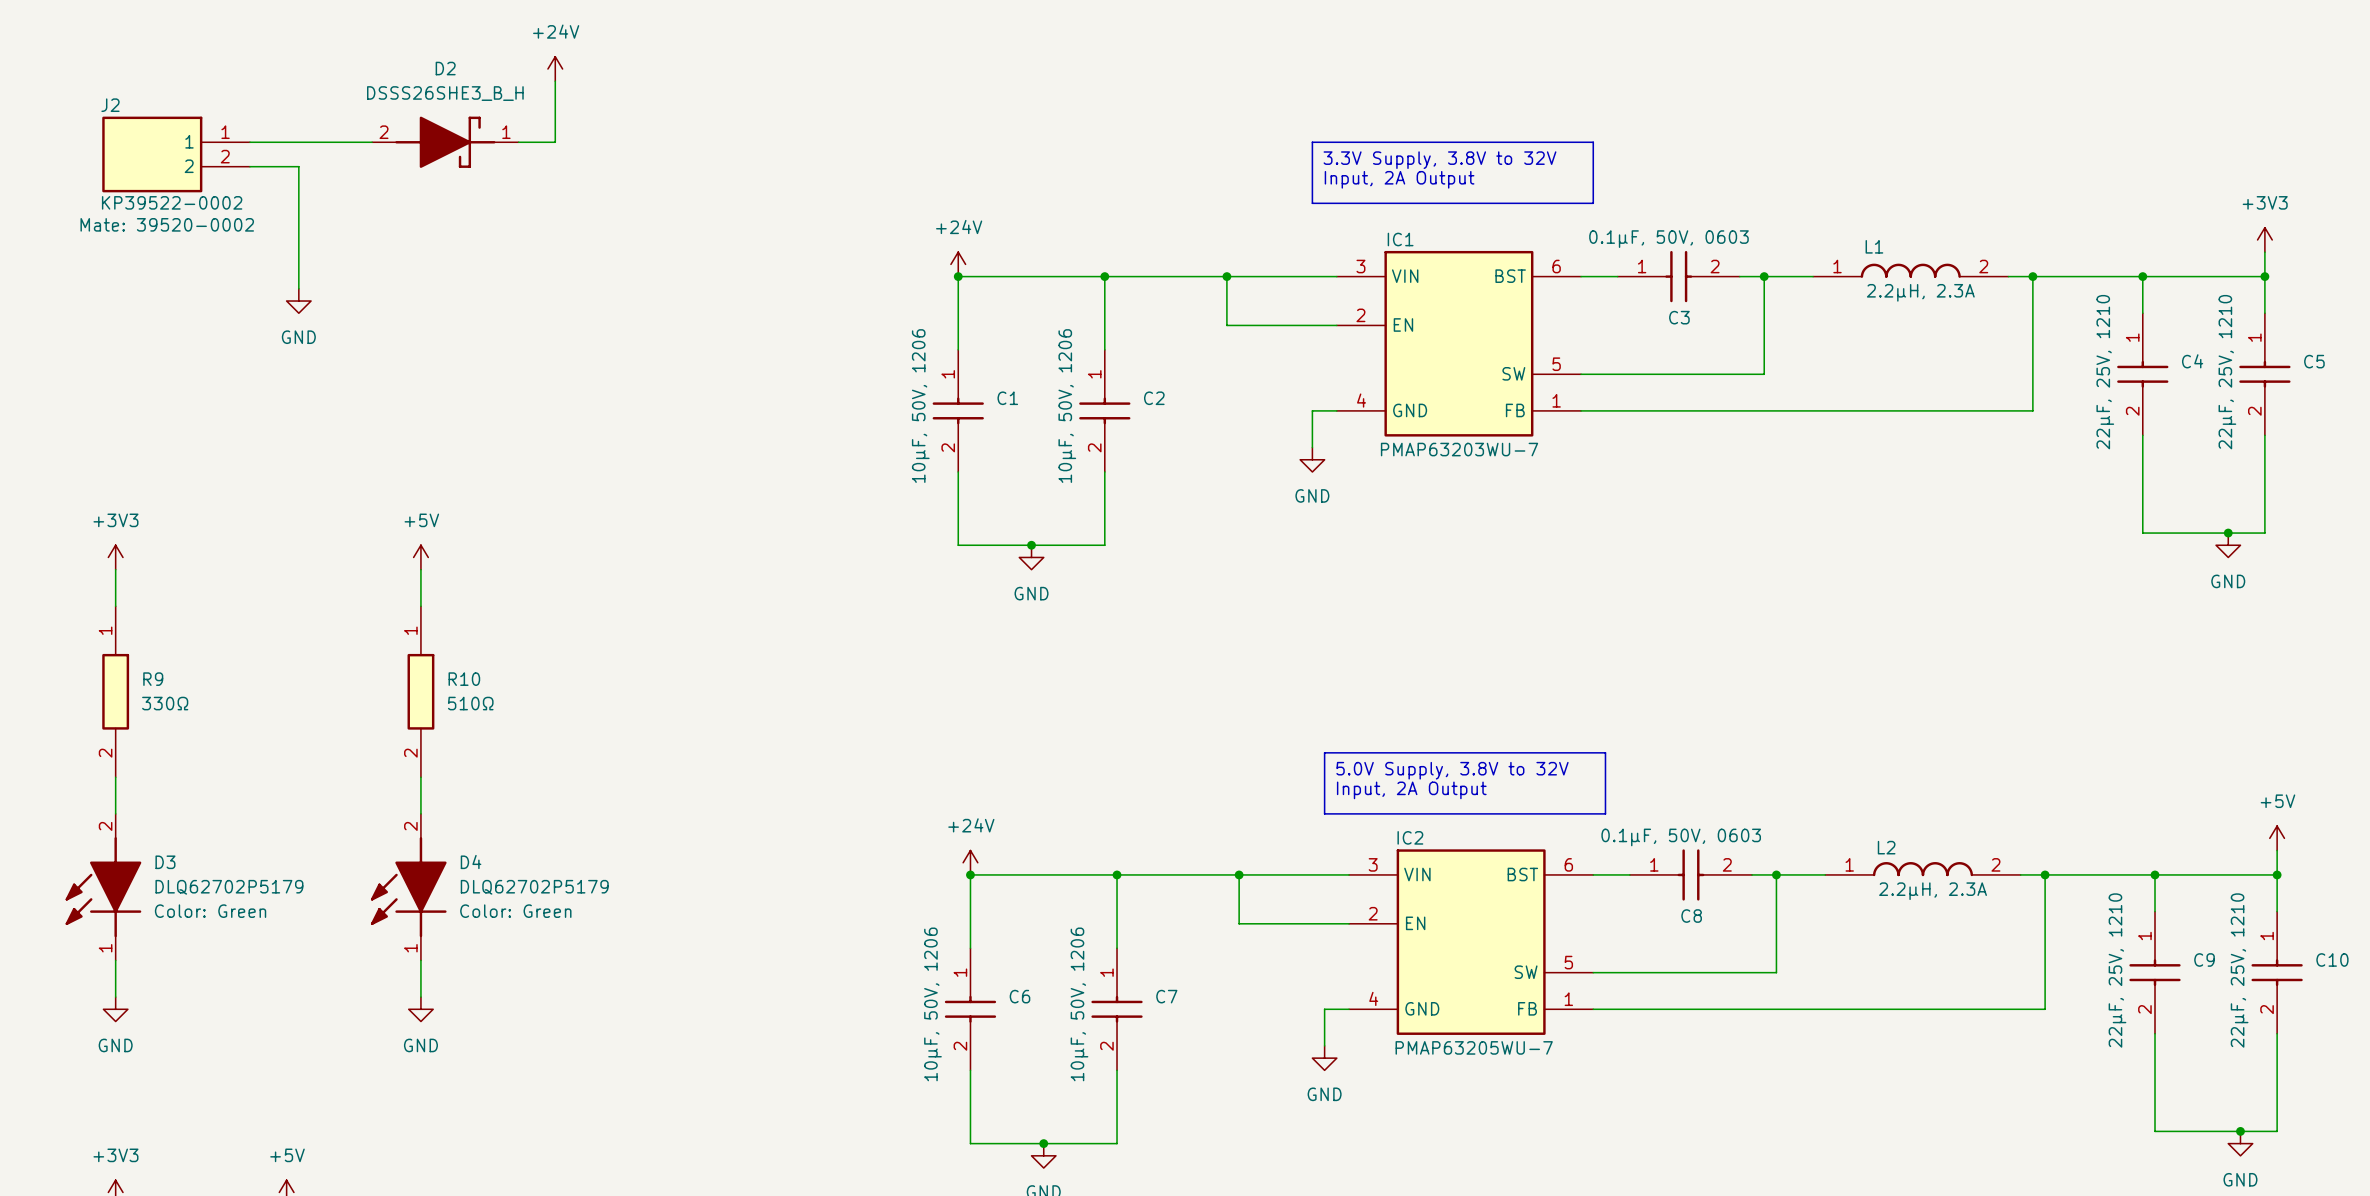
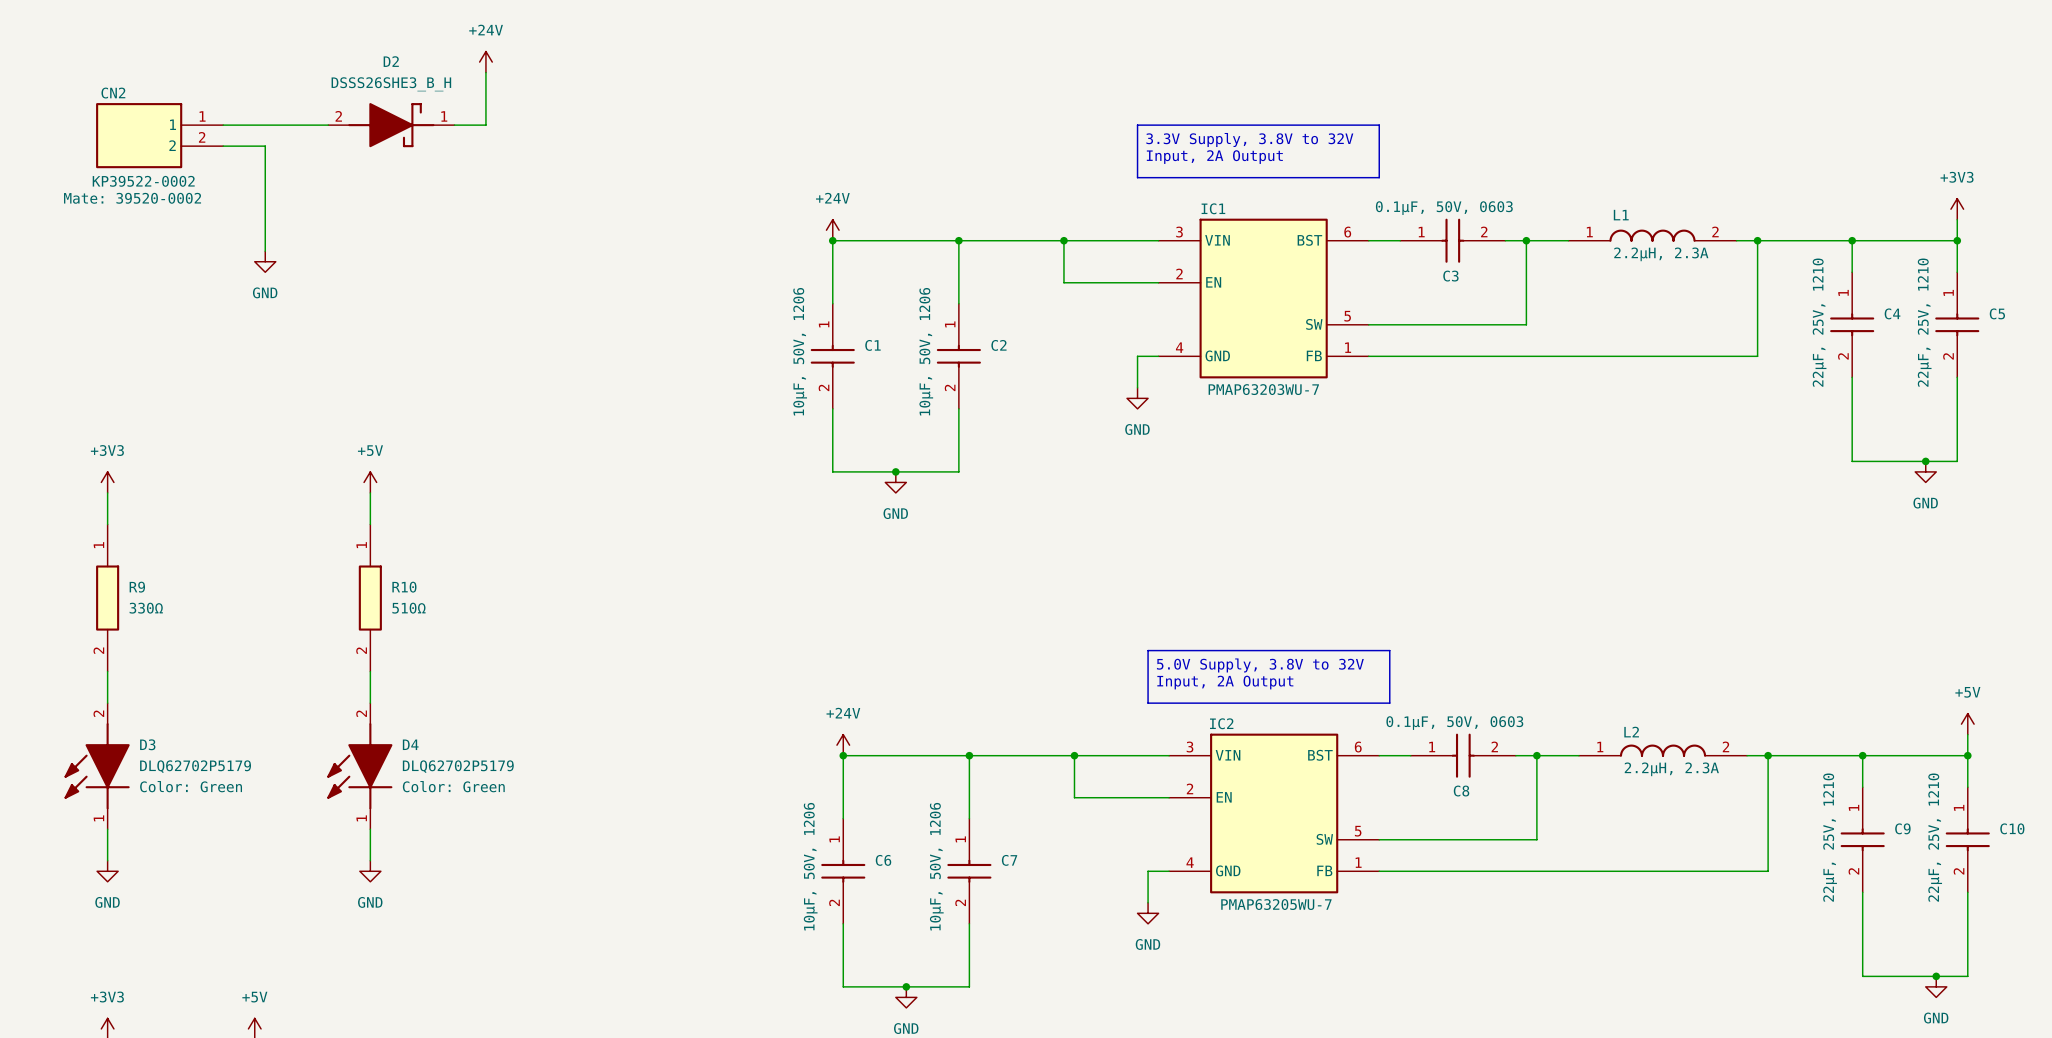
J2 name: J2 (110, 105) -> CN2 (113, 93)
J2 value position: KP39522-0002 (172, 202) -> KP39522-0002 (143, 181)
J2 text position: Mate: 39520-0002 (167, 224) -> Mate: 39520-0002 (132, 198)

